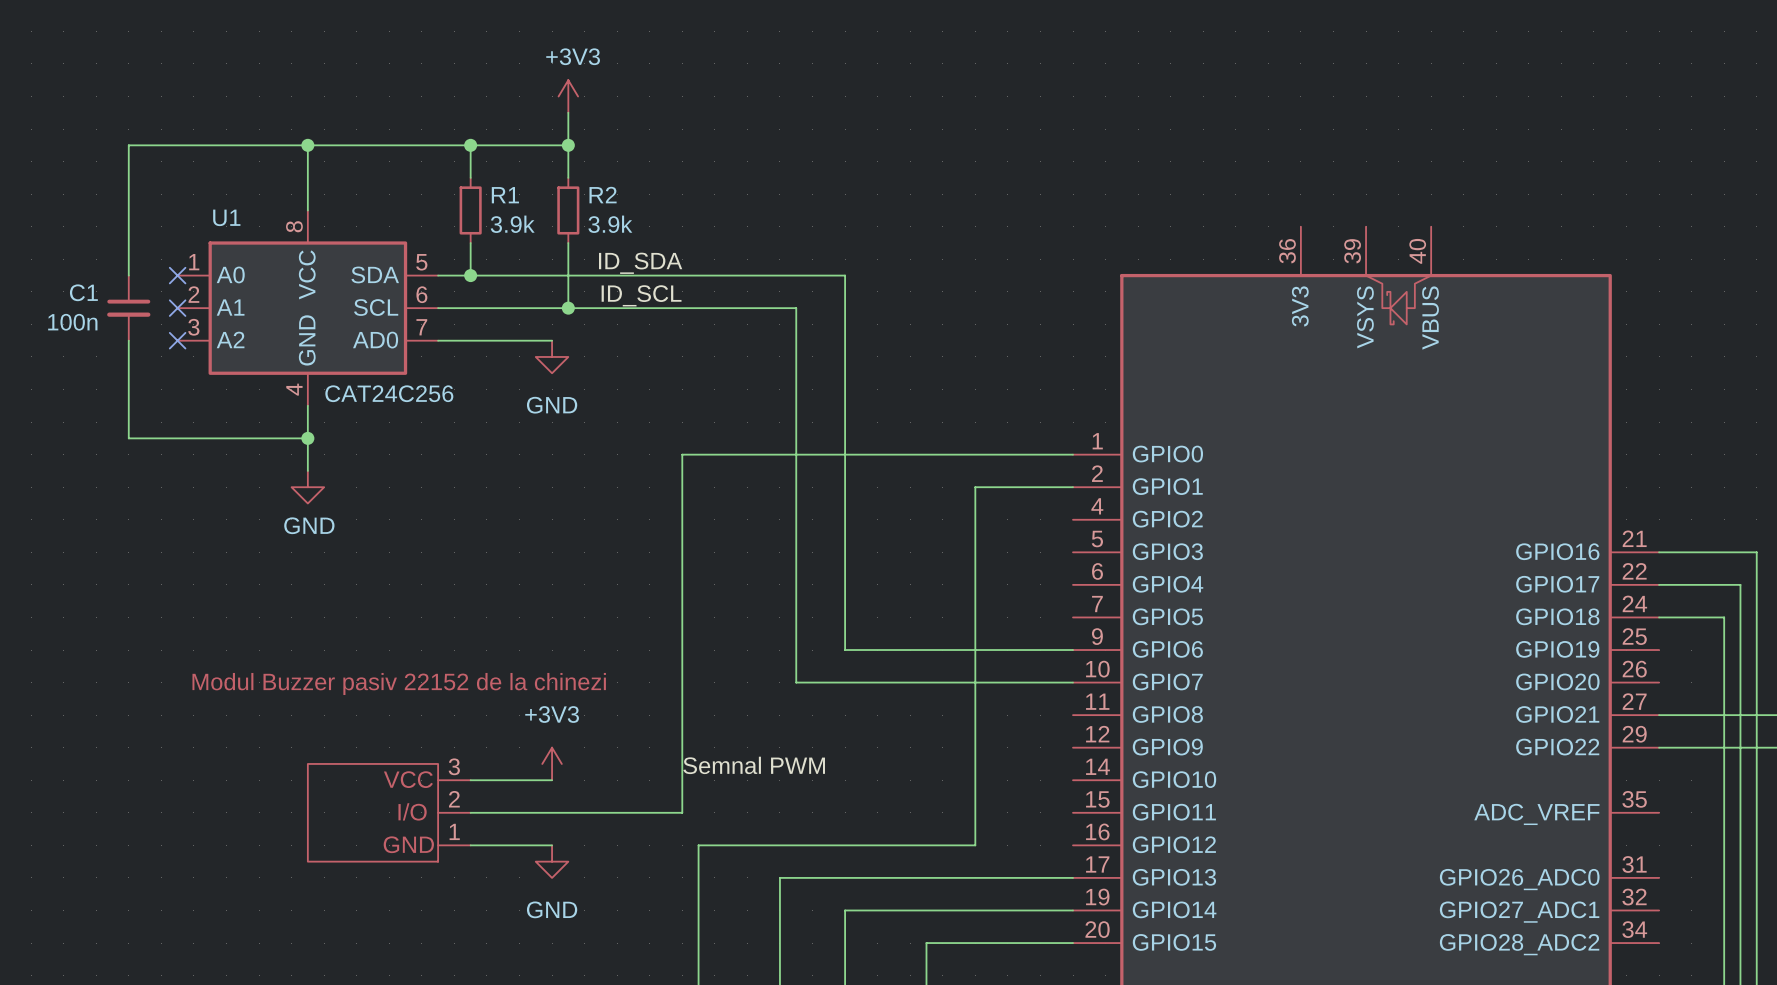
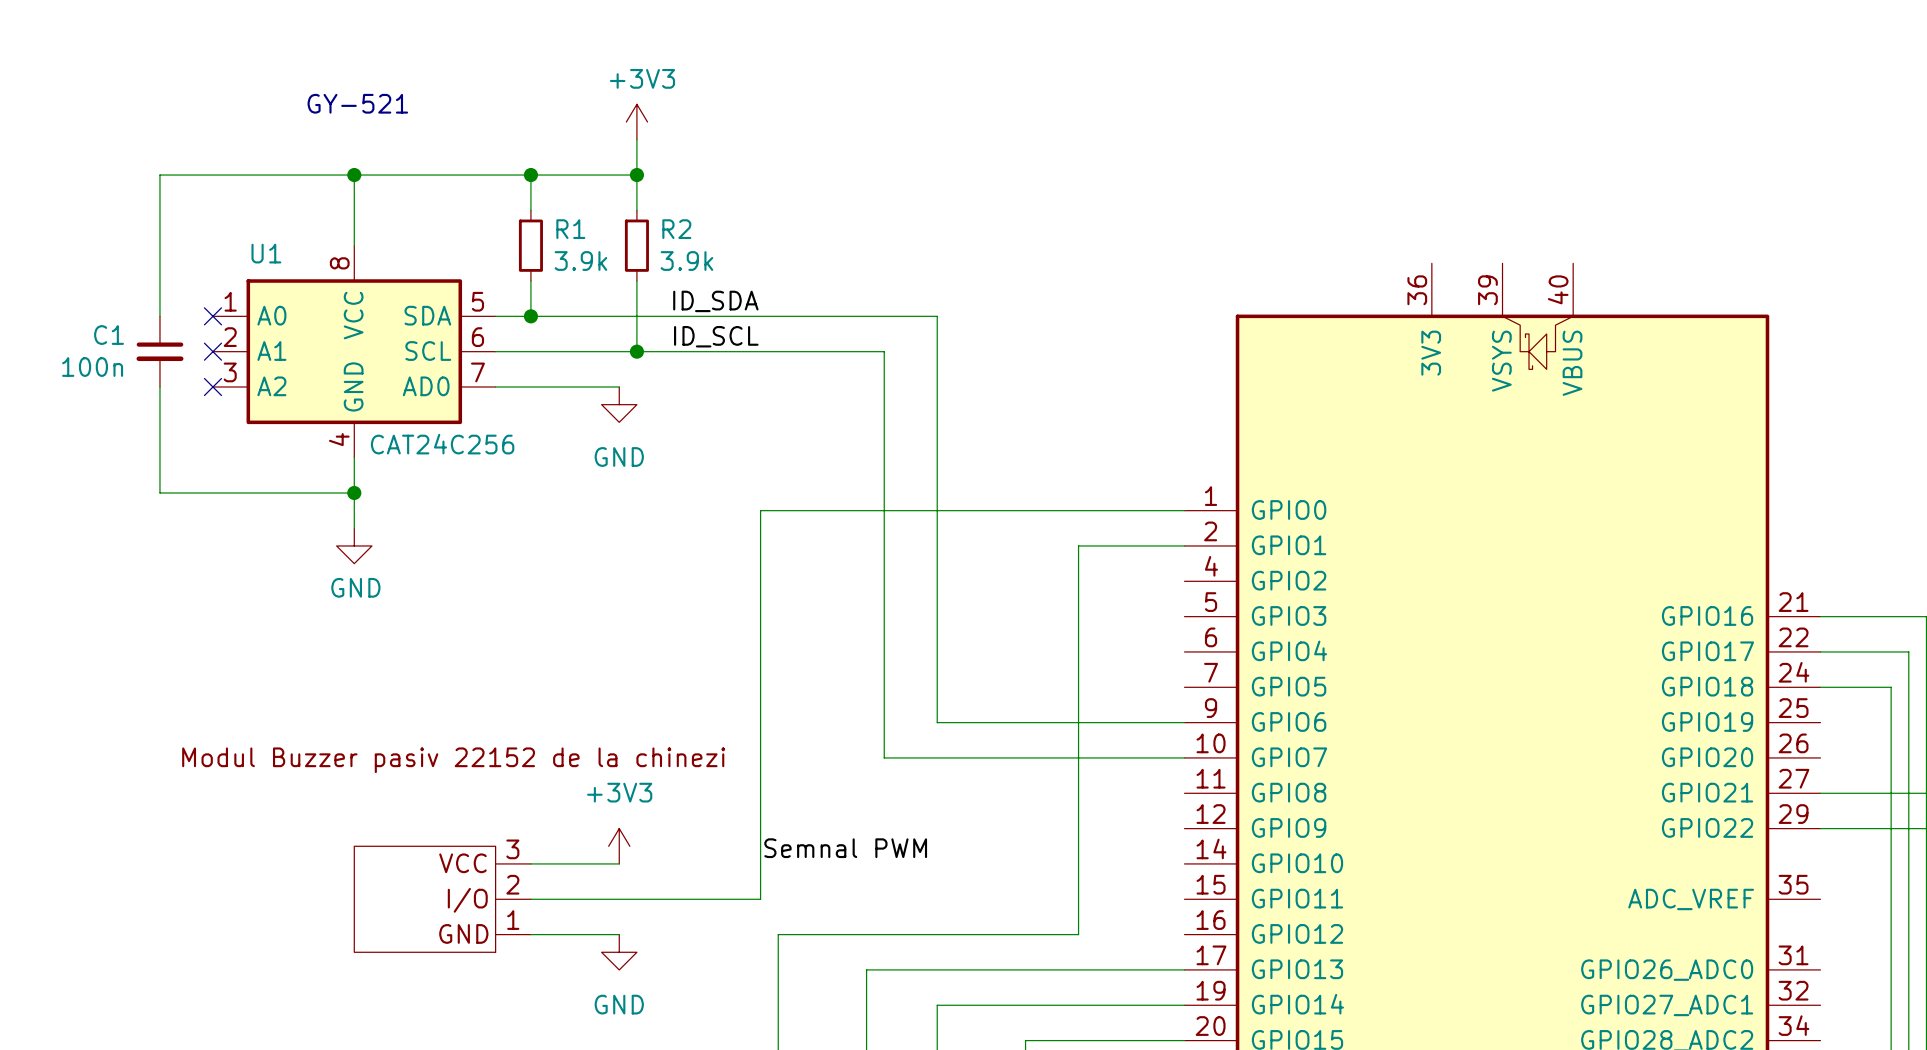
text: none -> GY-521 (357, 103)

